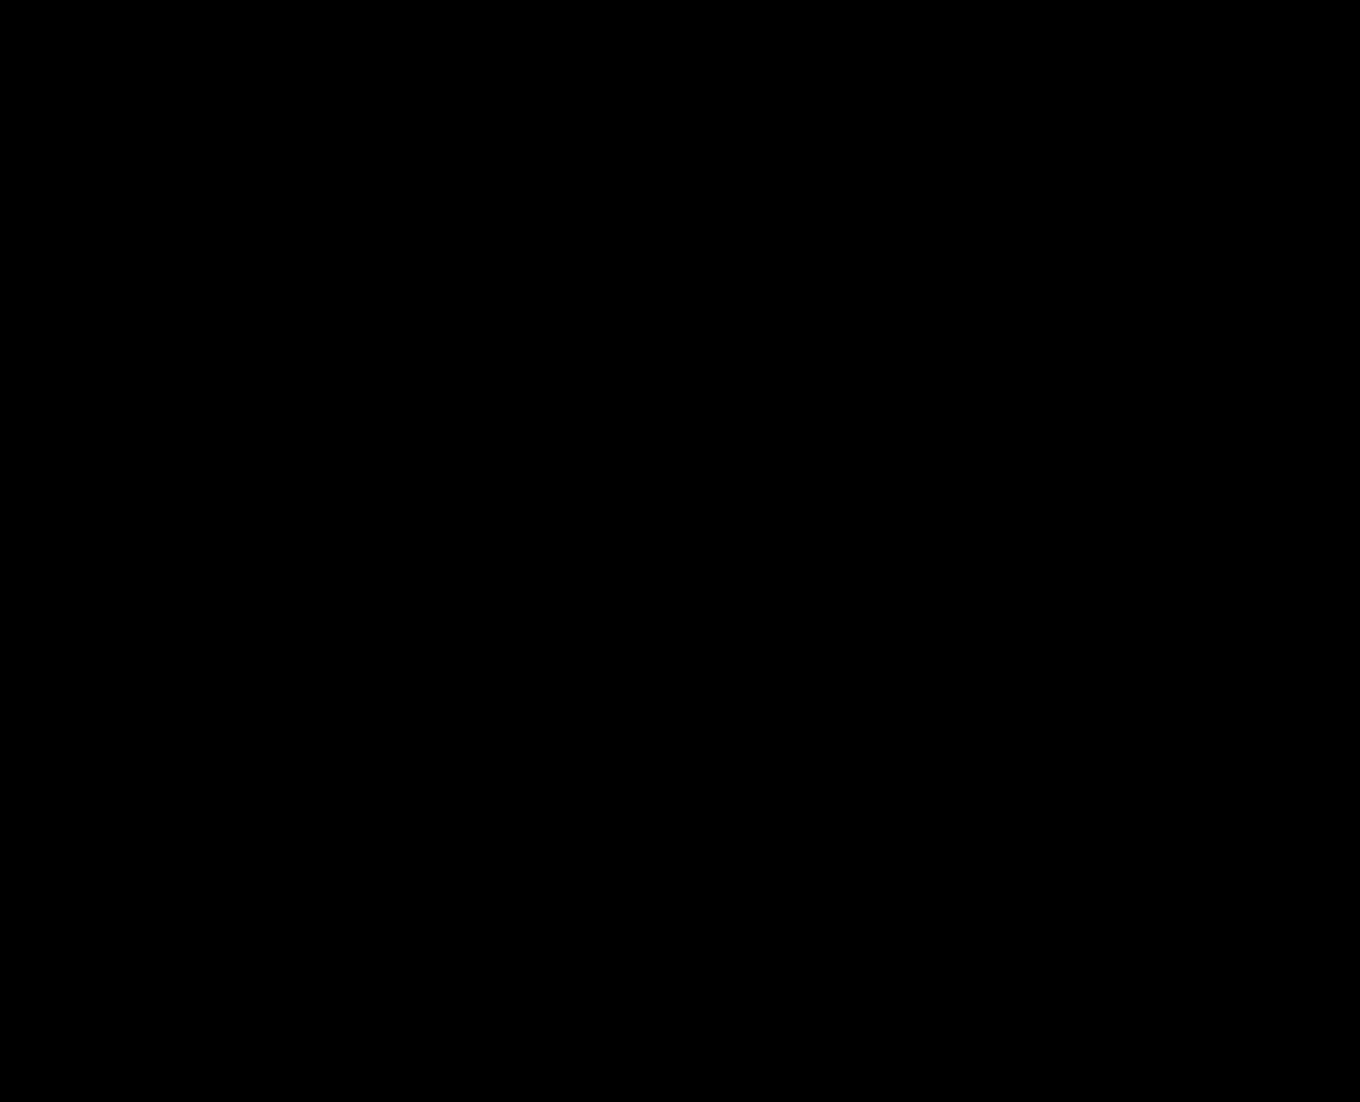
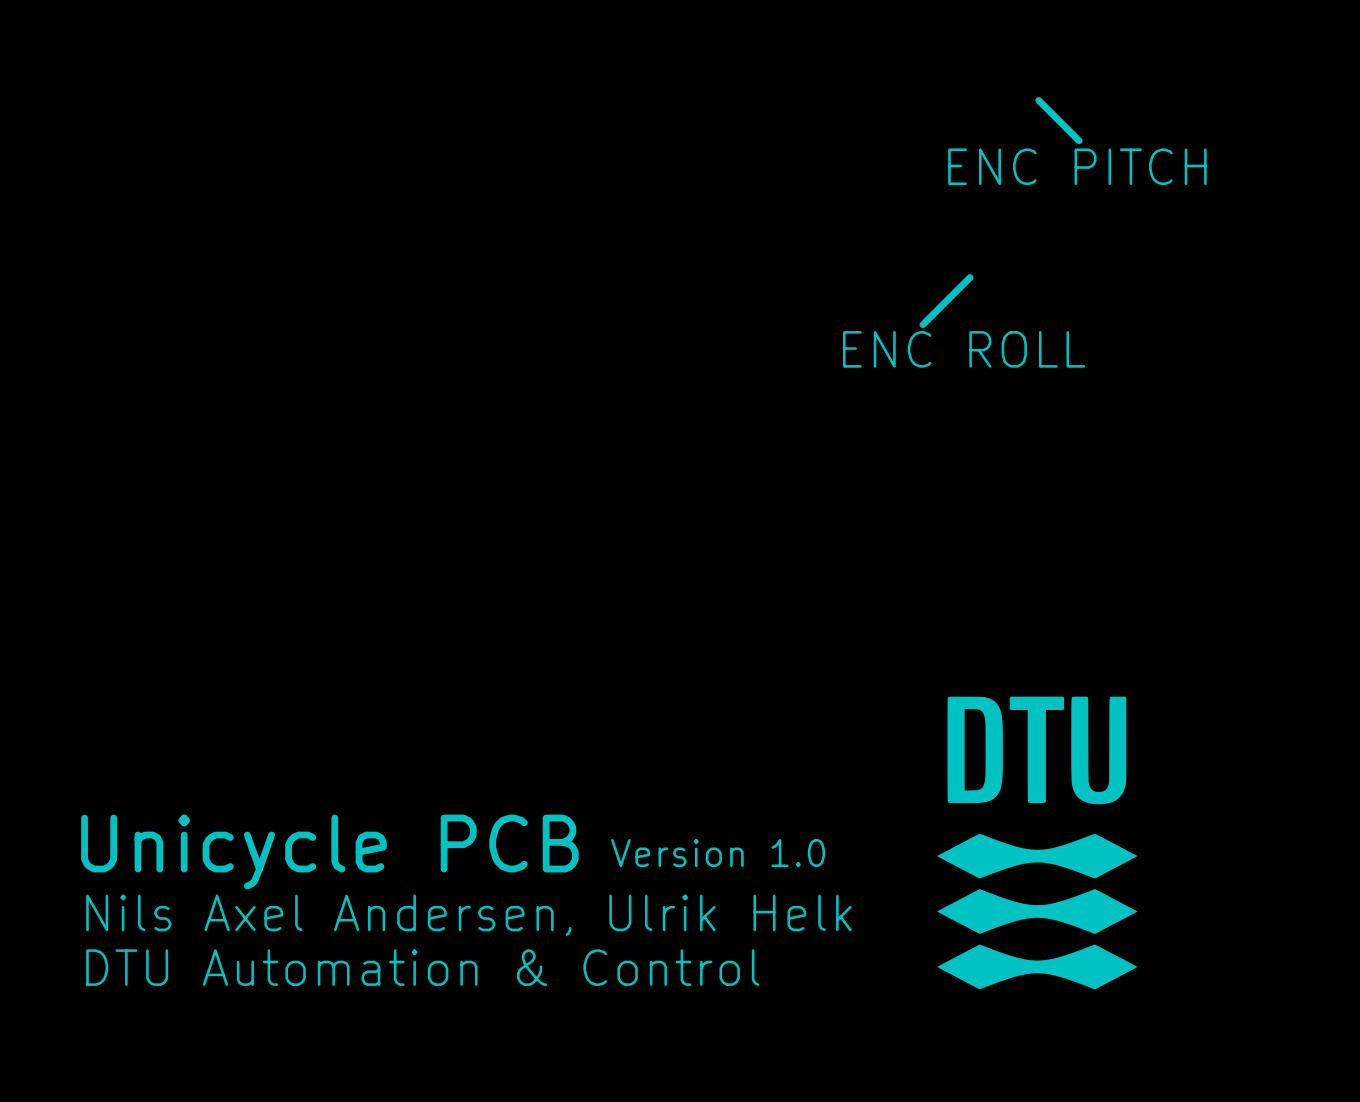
line: none -> (1038, 100) (1079, 140)
text: none -> ENC PITCH (1077, 166)
line: none -> (970, 277) (922, 324)
text: none -> ENC ROLL (964, 349)
drawing: none -> [937, 696, 1138, 990]
text: none -> Unicycle PCB (329, 852)
text: none -> Version 1.0 (718, 853)
text: none -> Nils Axel Andersen, Ulrik Helk (468, 915)
text: none -> DTU Automation & Control (422, 967)

